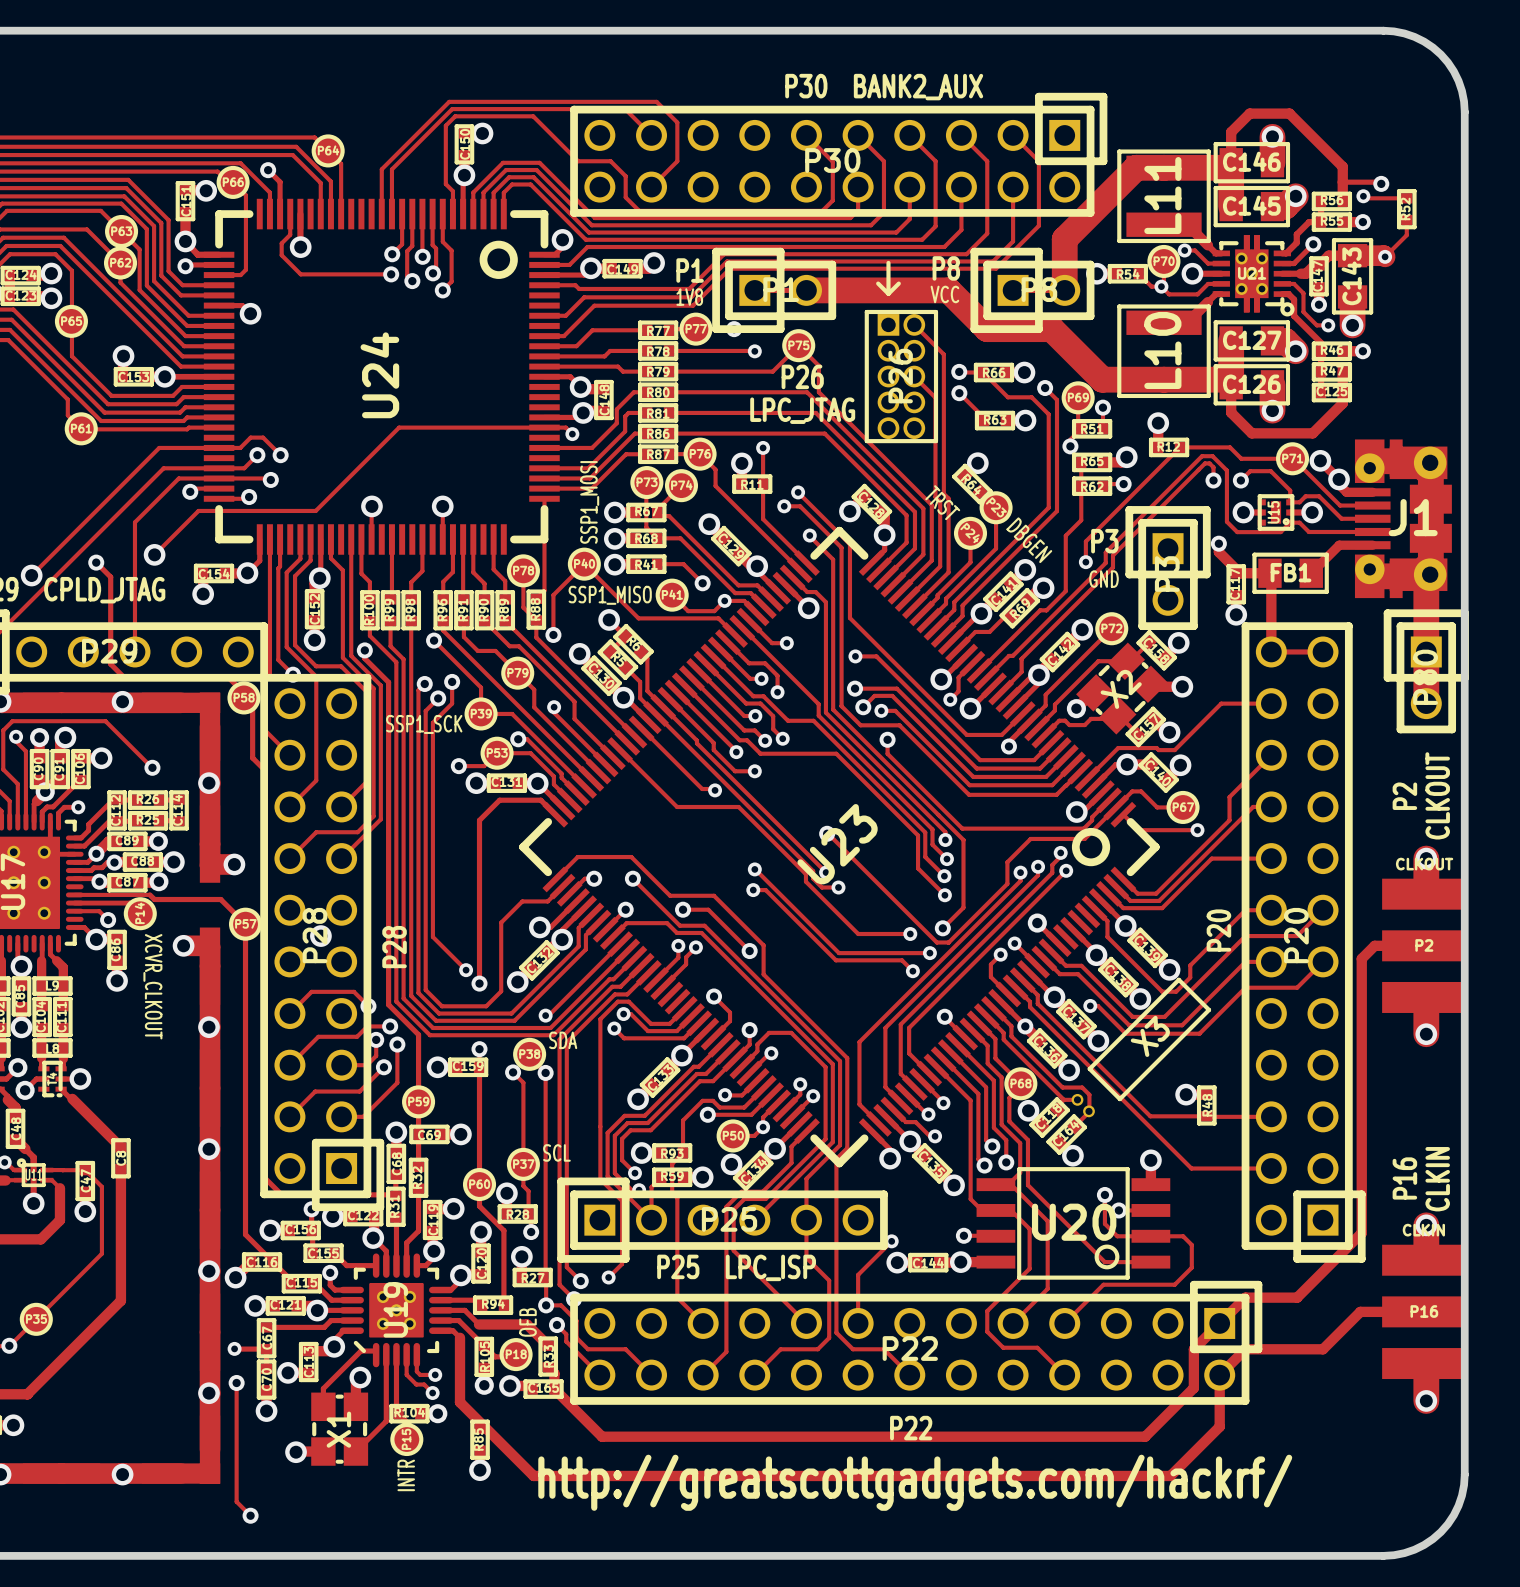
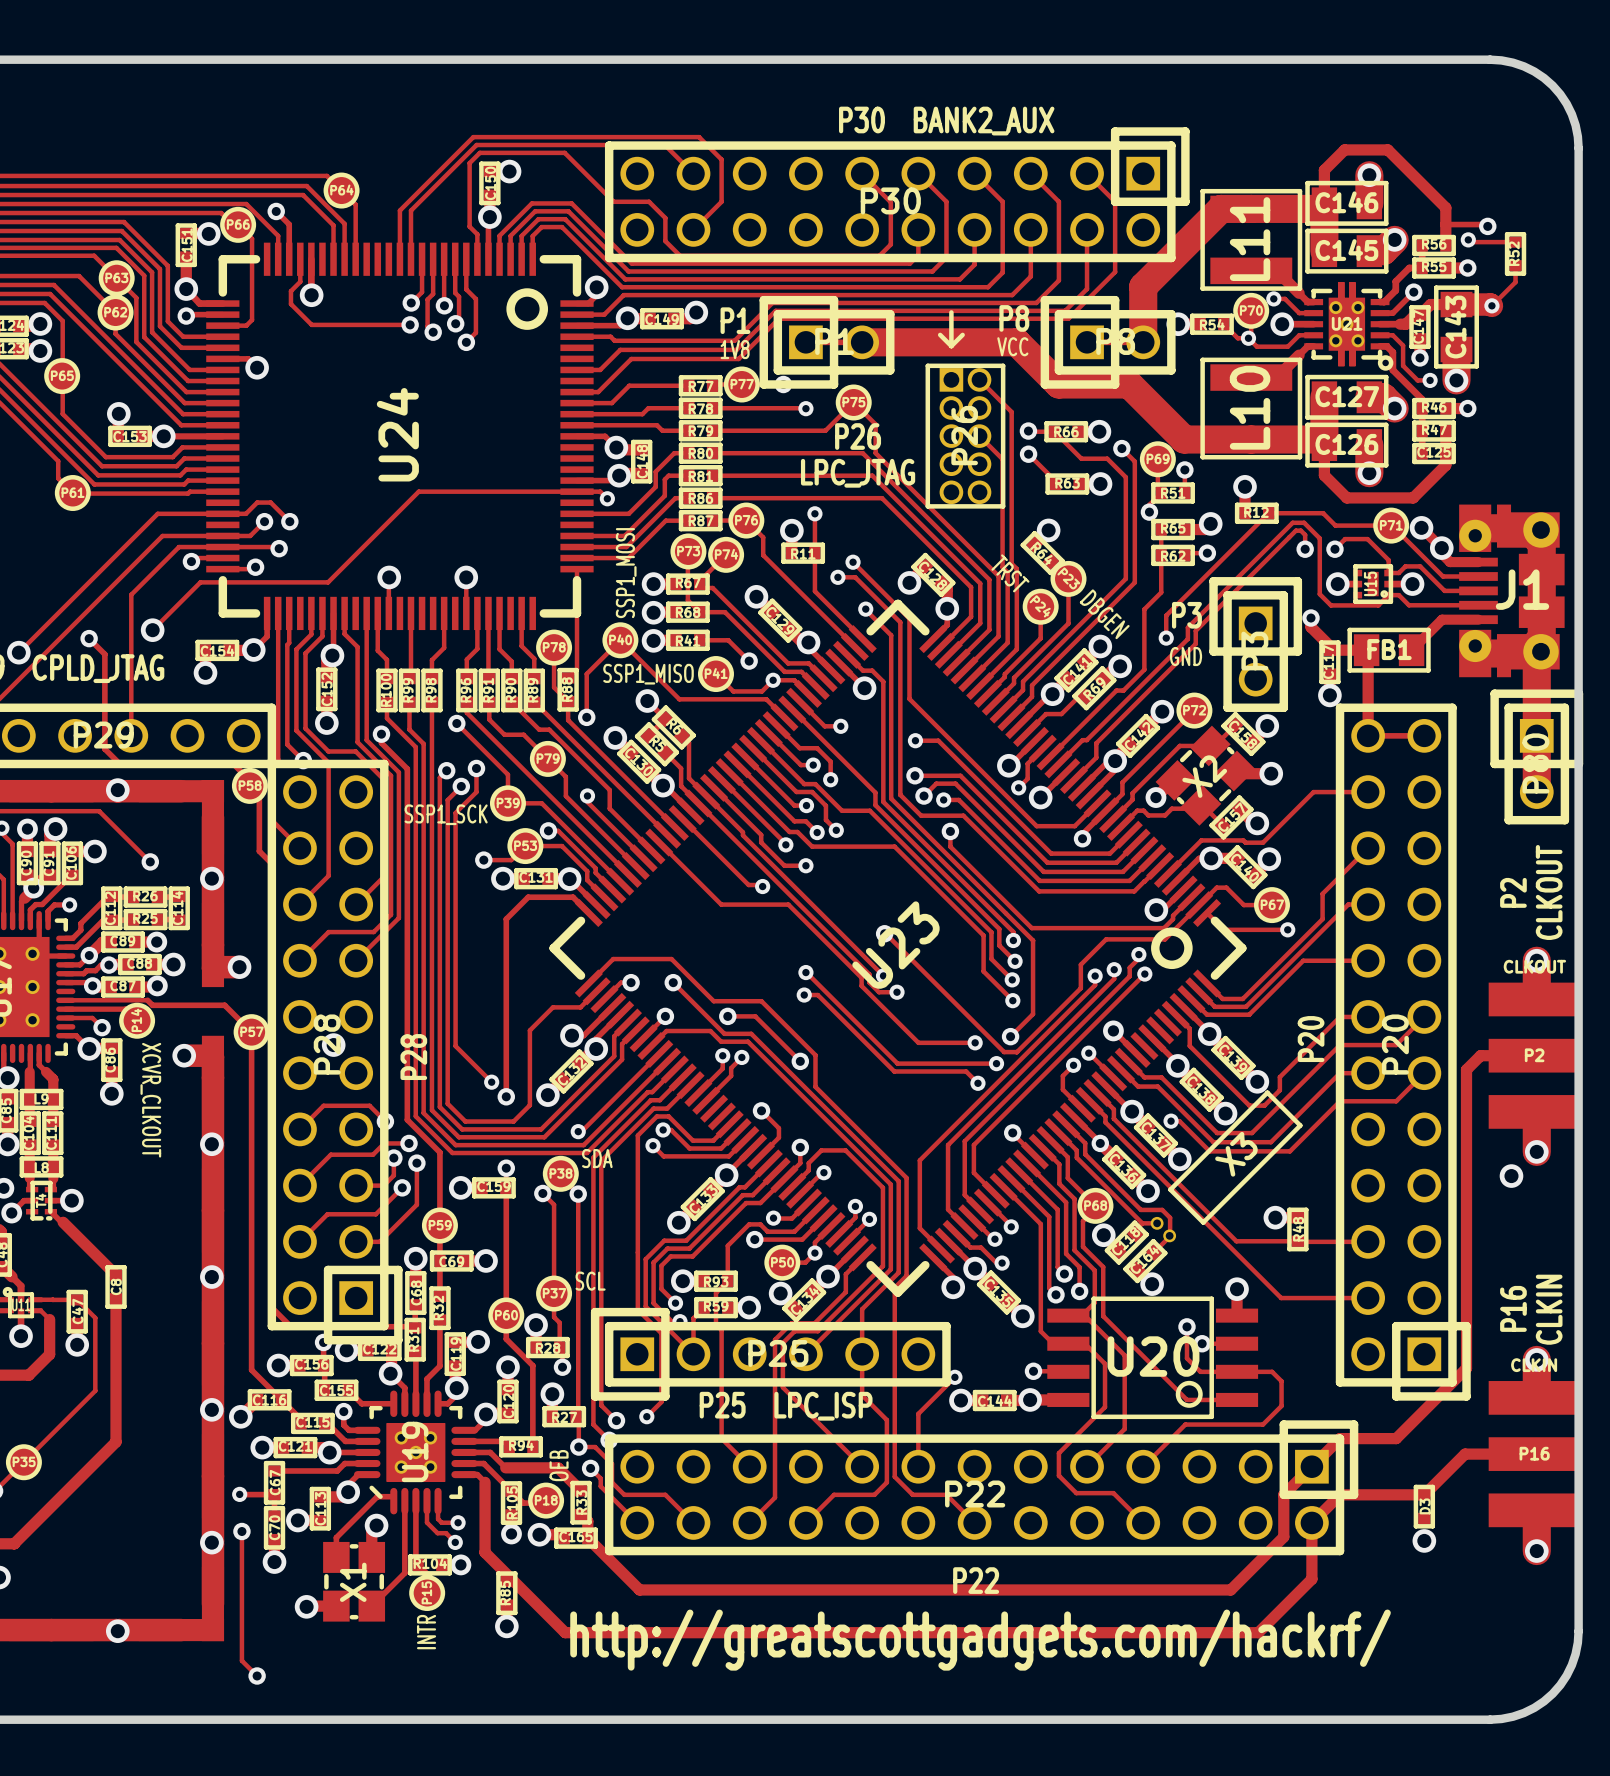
via: none -> (1511, 1176)
D3: none -> (1424, 1506)
via: none -> (1424, 1540)

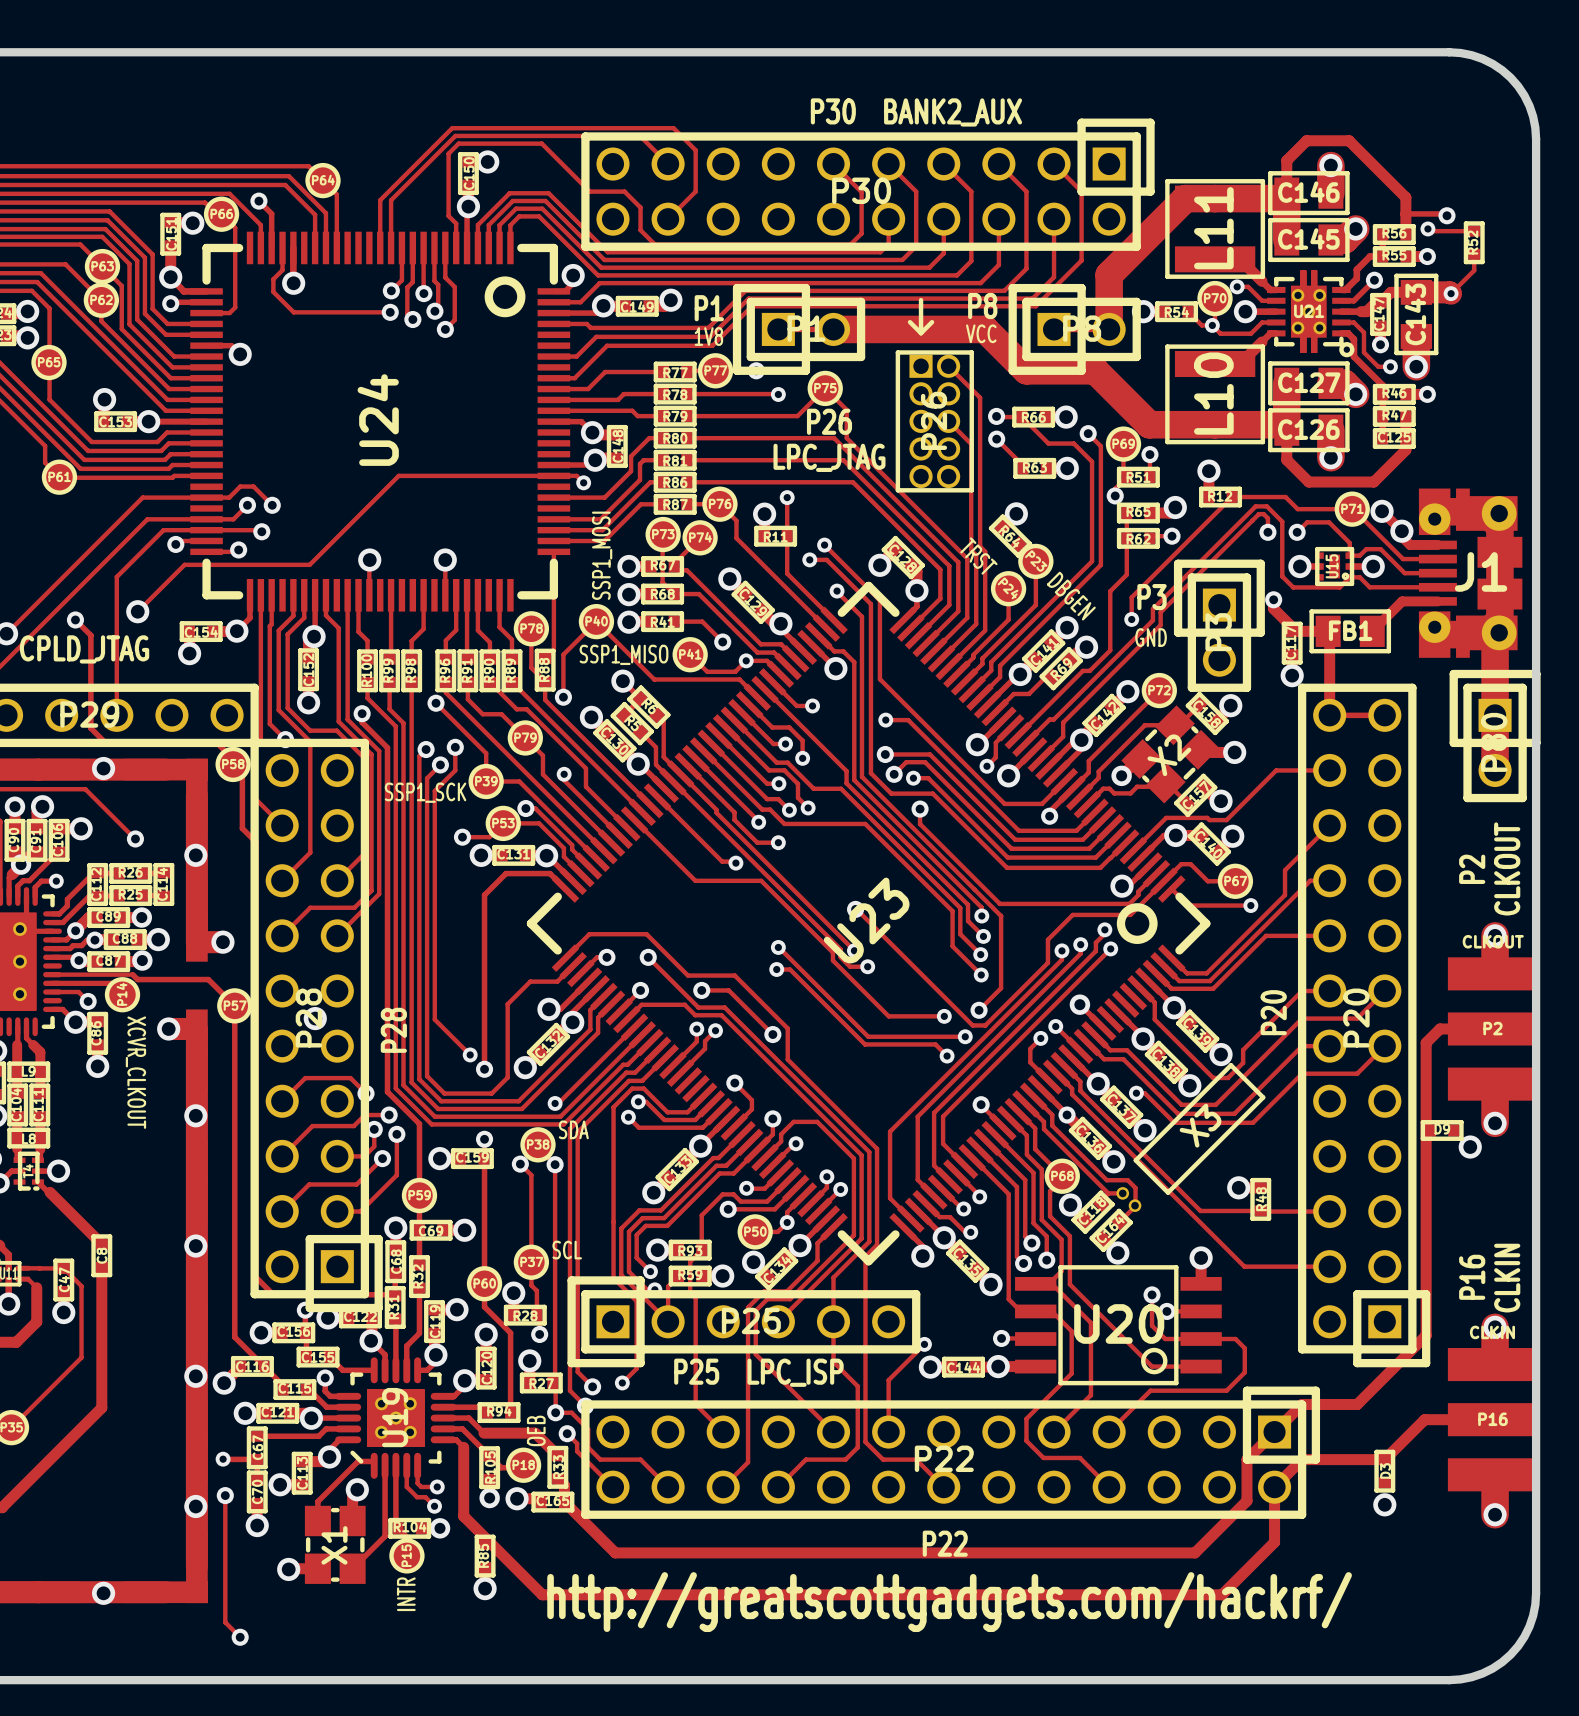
D9: none -> (1442, 1130)

